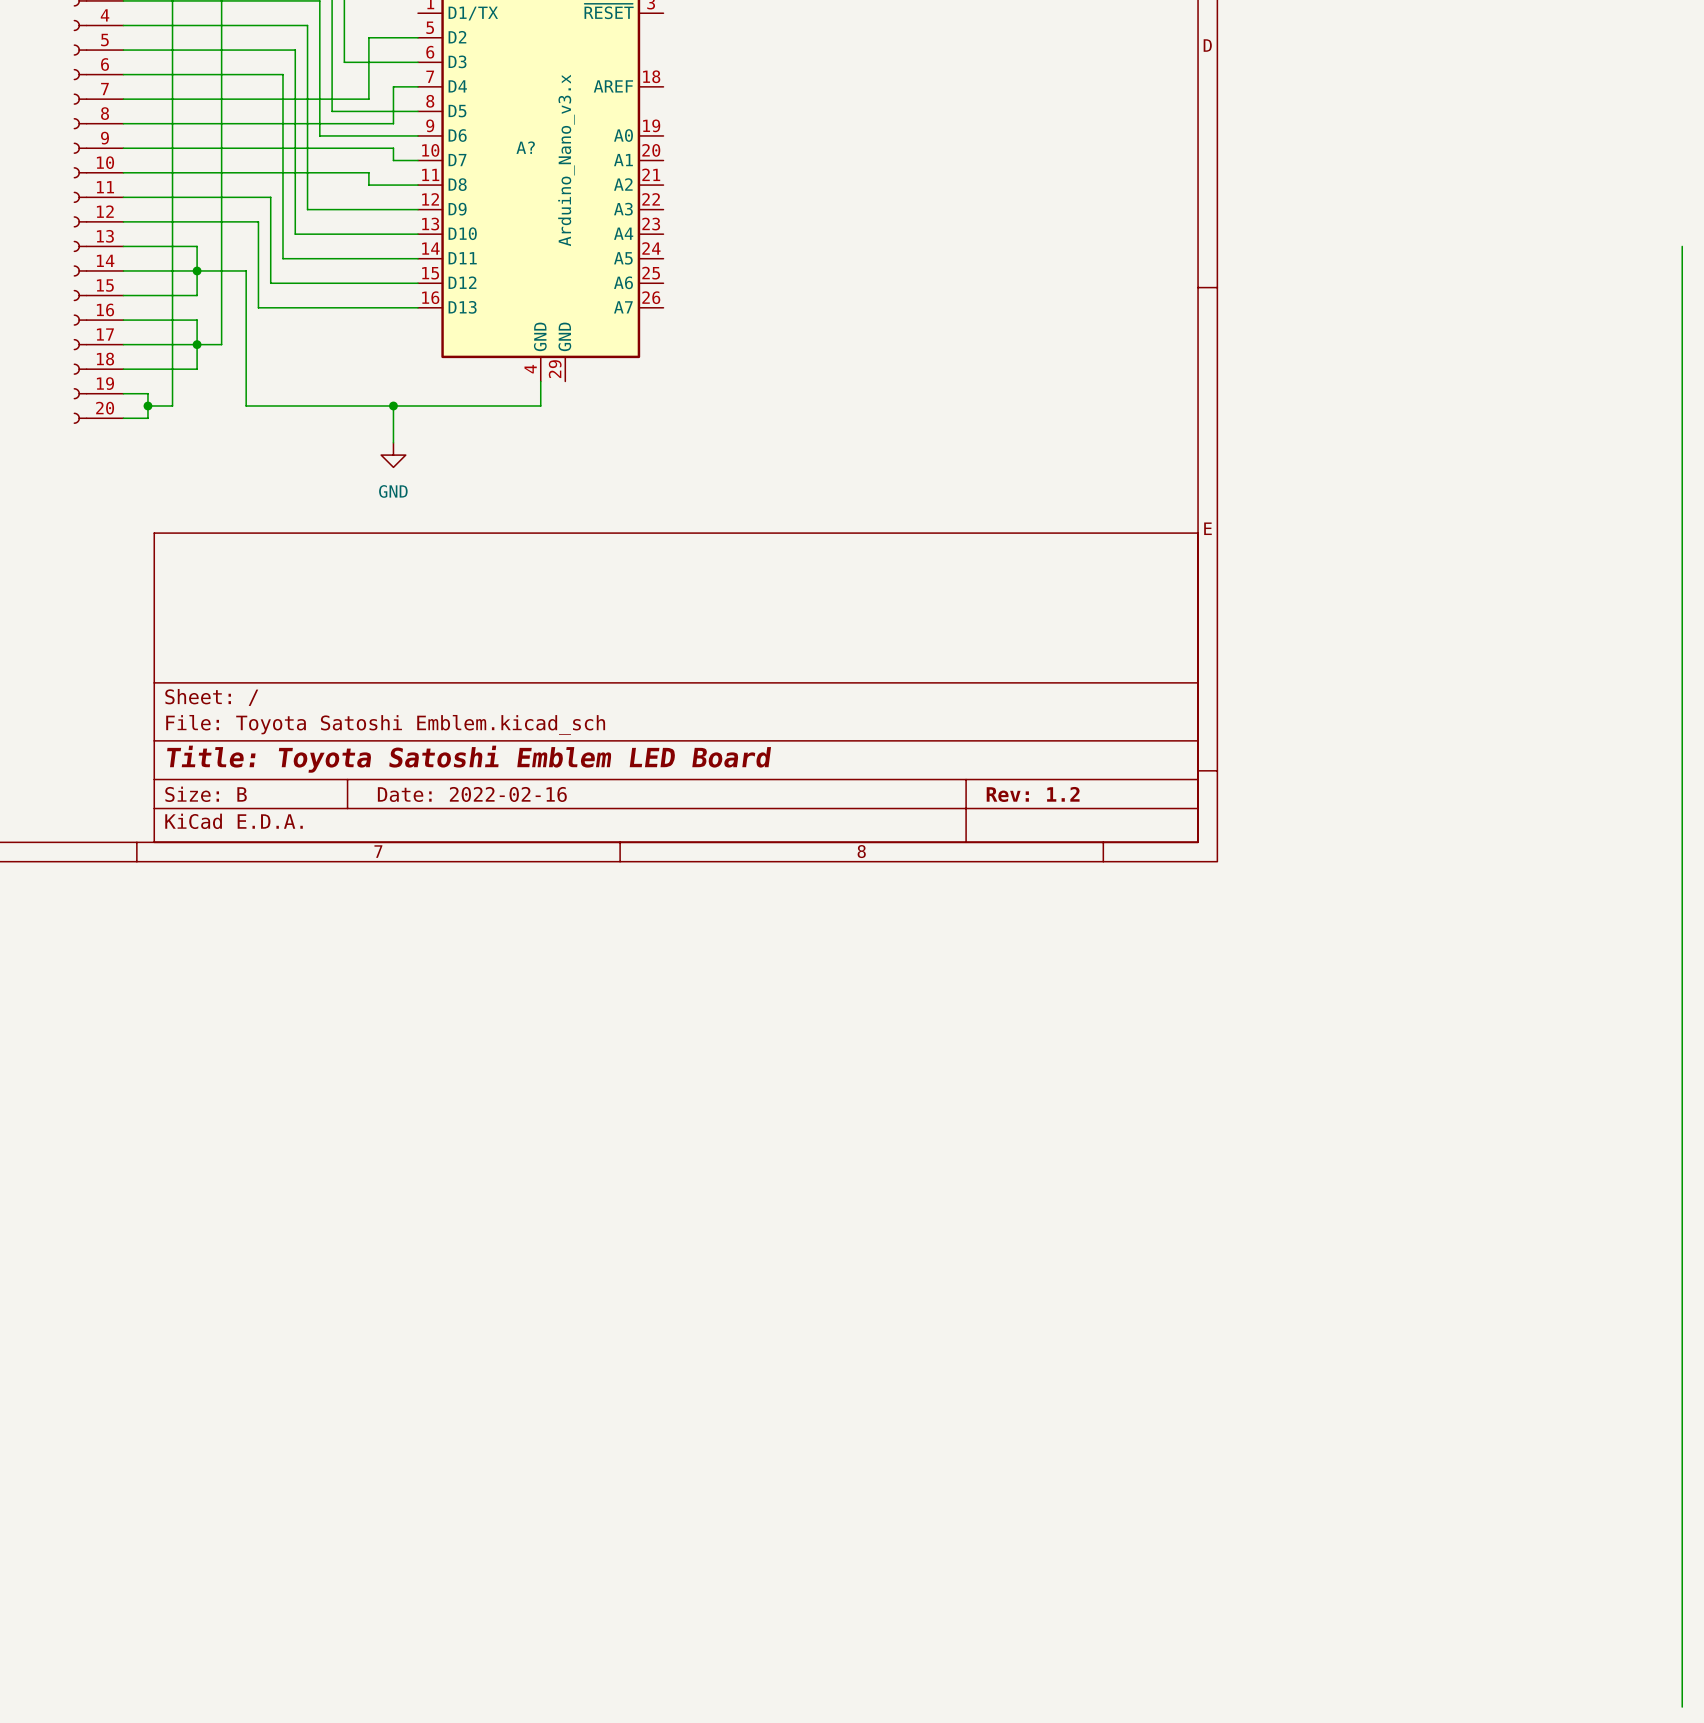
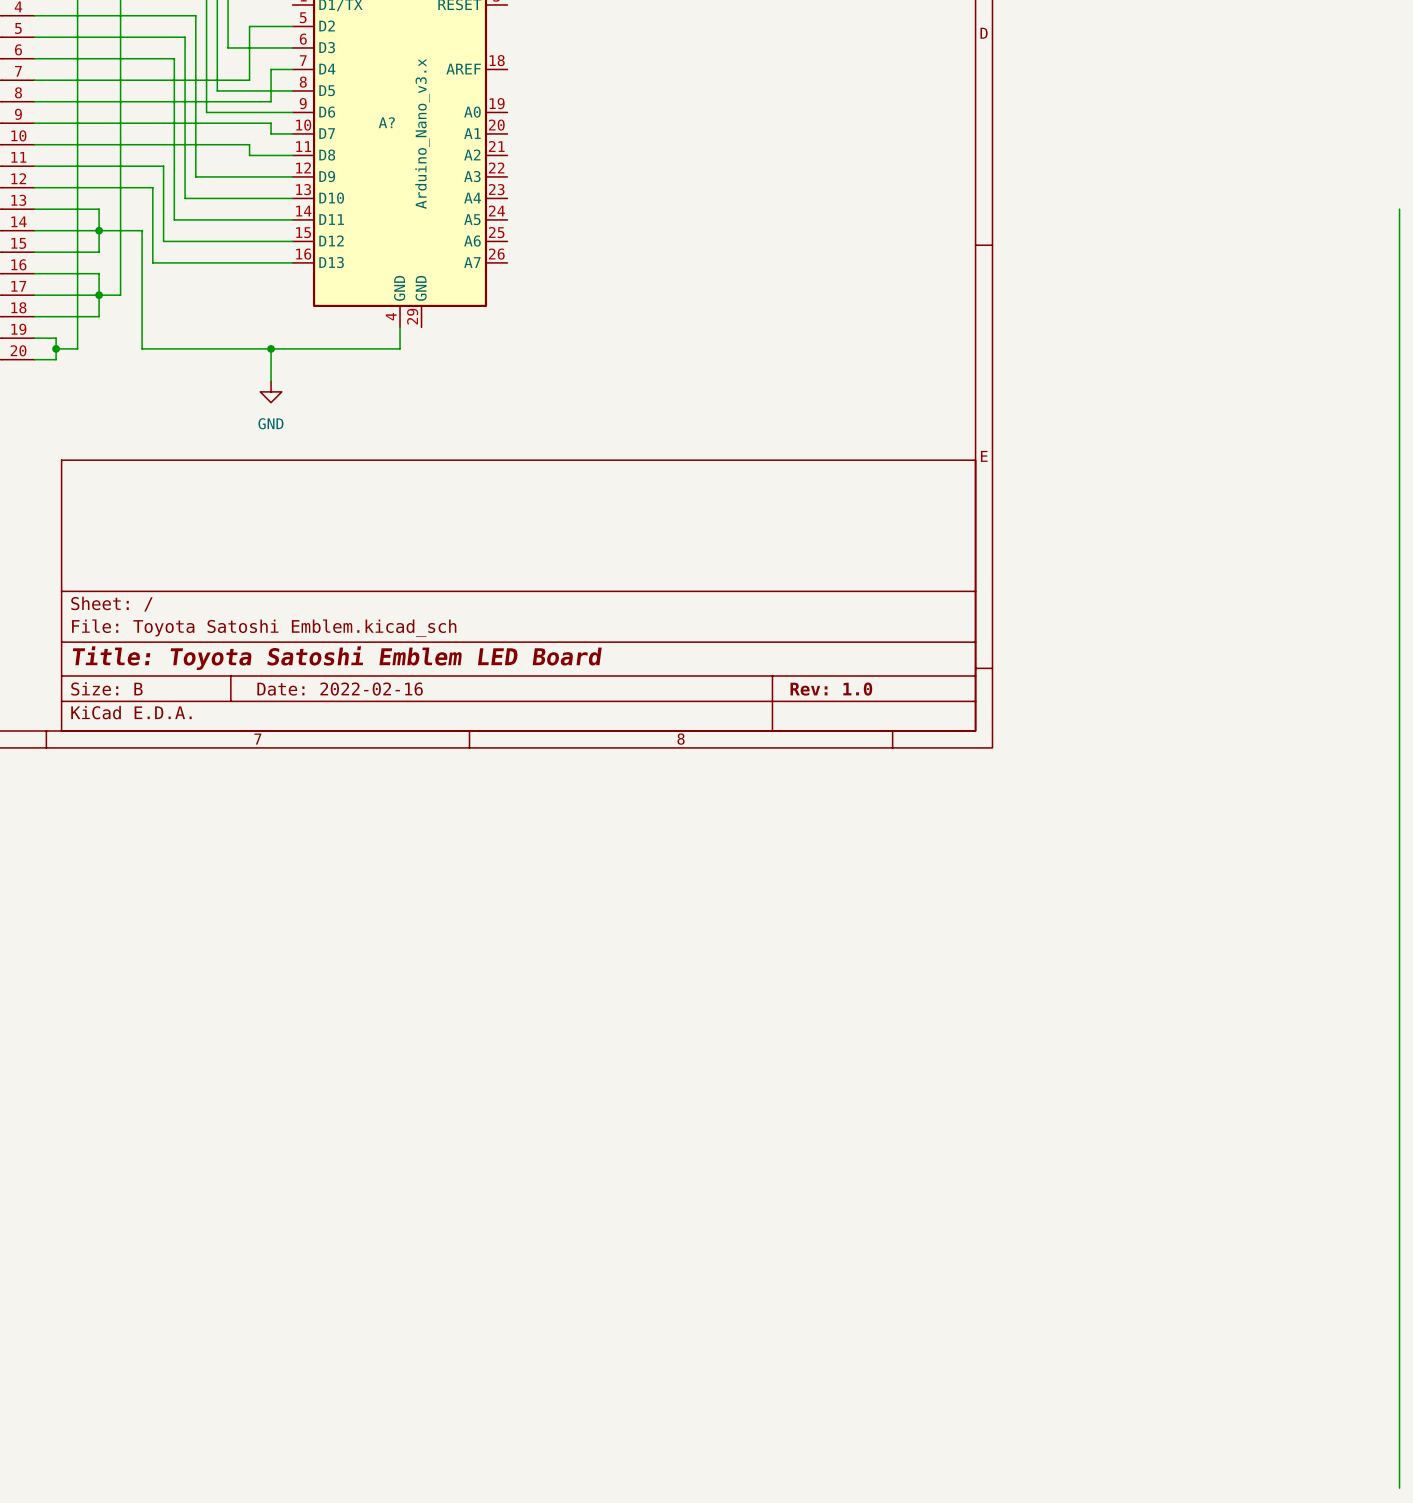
title block: Rev: 1.2 (1033, 794) -> Rev: 1.0 (831, 689)

